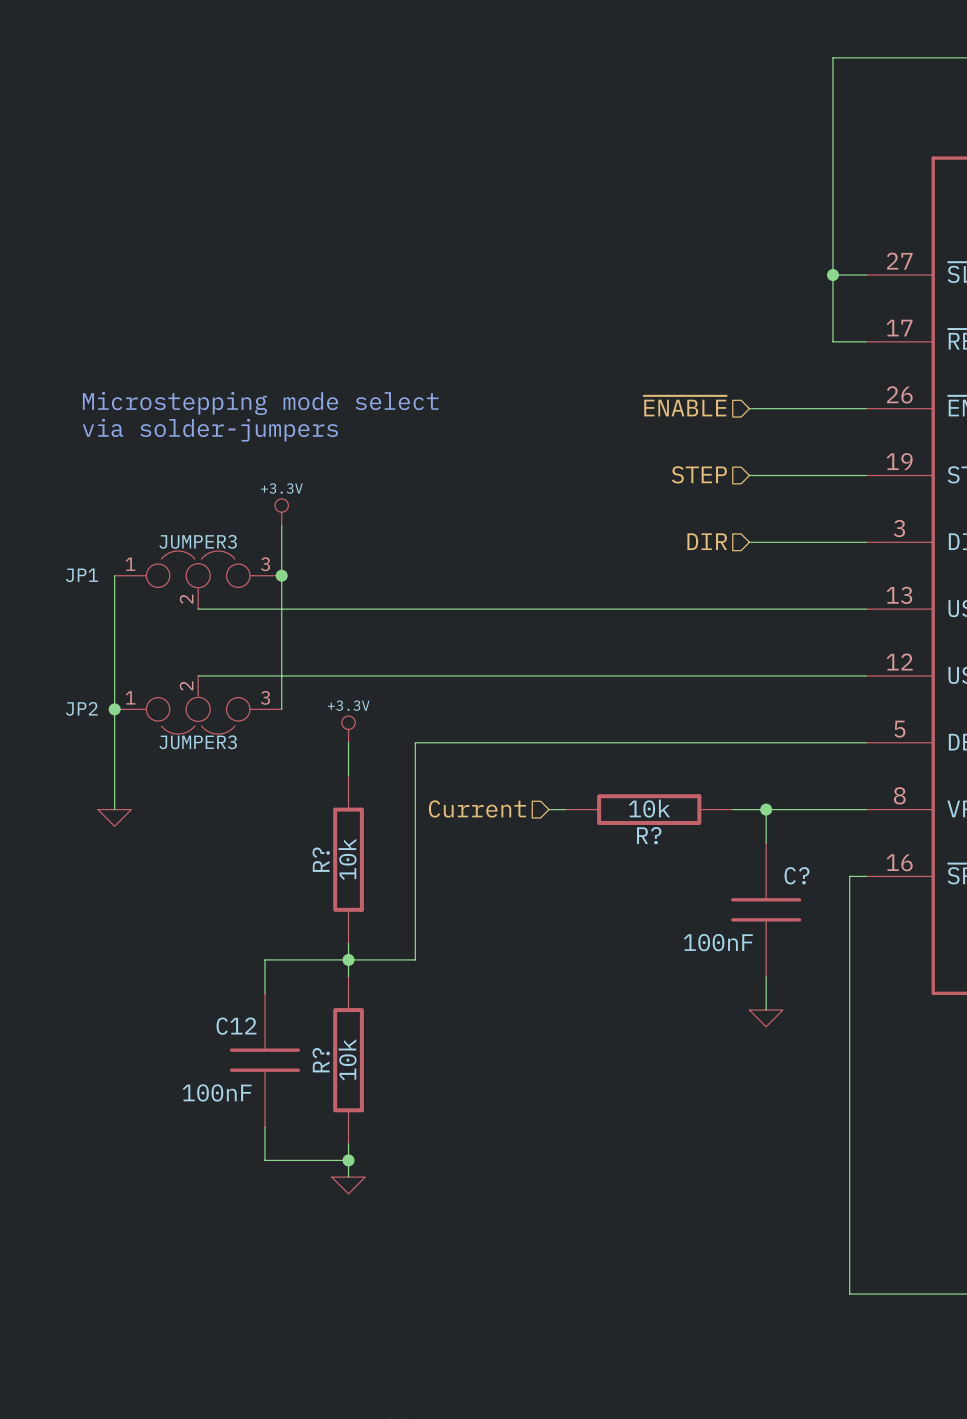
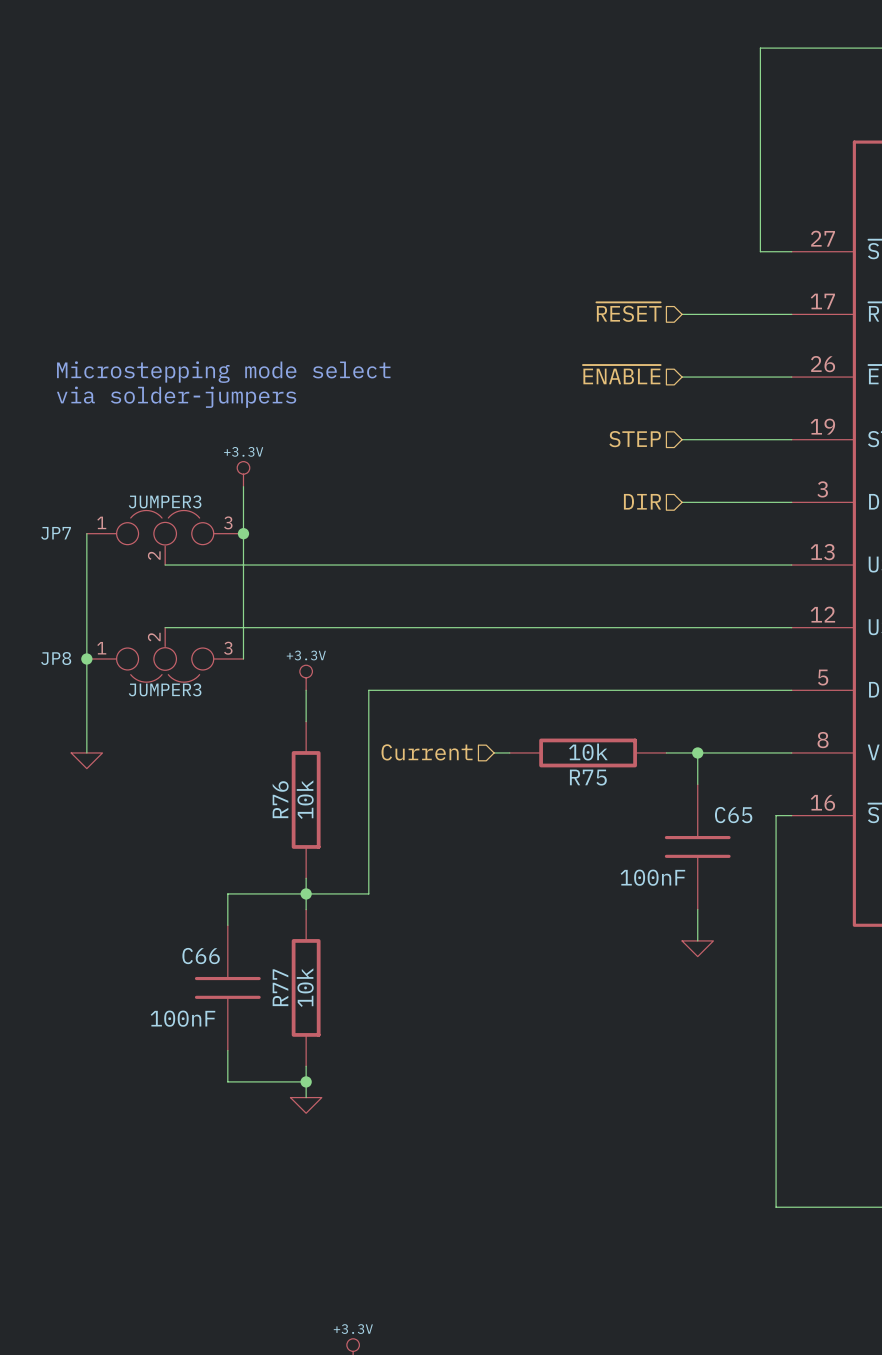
wire: (832, 275) (832, 341) -> (682, 314) (760, 314)
junction: (832, 275) -> none
hierarchical label: none -> ~{RESET} (629, 312)
JP1 name: JP1 (82, 575) -> JP7 (56, 533)
JP2 name: JP2 (81, 708) -> JP8 (56, 658)
R? name: R? (649, 835) -> R75 (588, 777)
R? name: R? (321, 859) -> R76 (280, 799)
C? name: C? (796, 875) -> C65 (733, 815)
C12 name: C12 (236, 1026) -> C66 (201, 956)
R? name: R? (321, 1060) -> R77 (280, 987)

